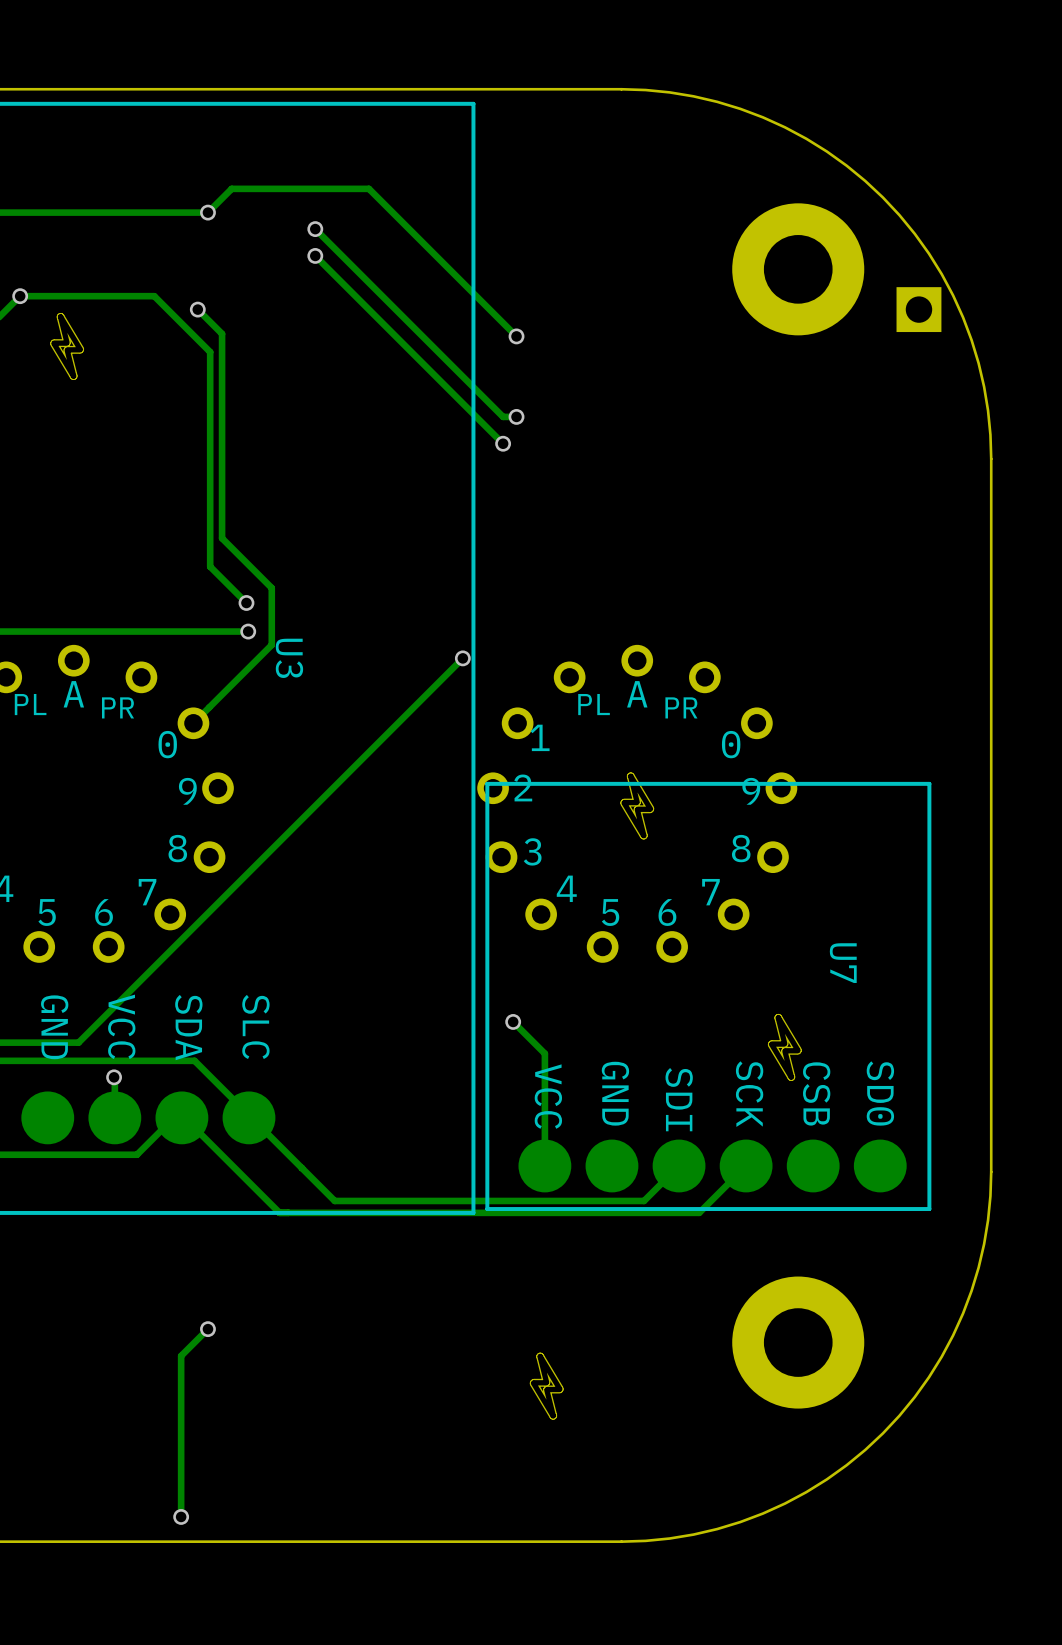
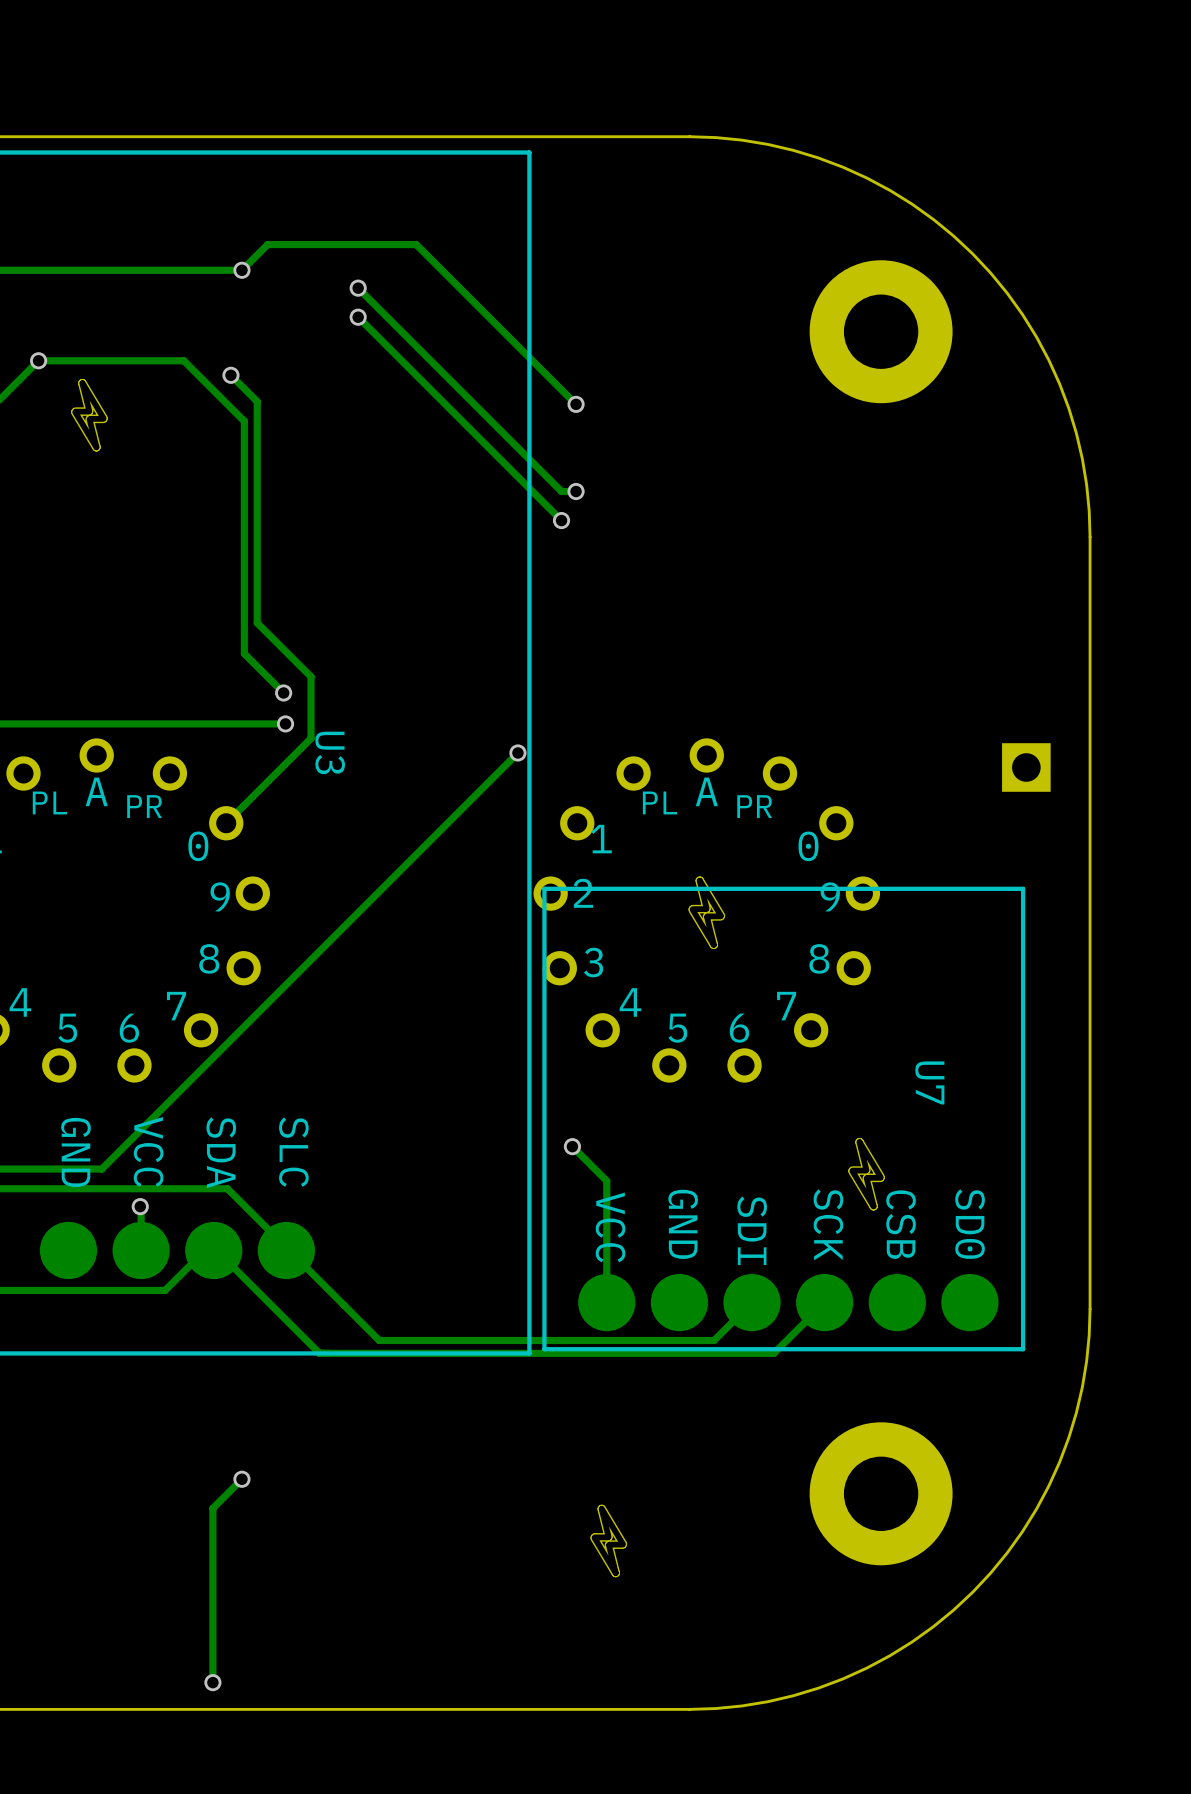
part position: (918, 309) -> (1026, 767)

